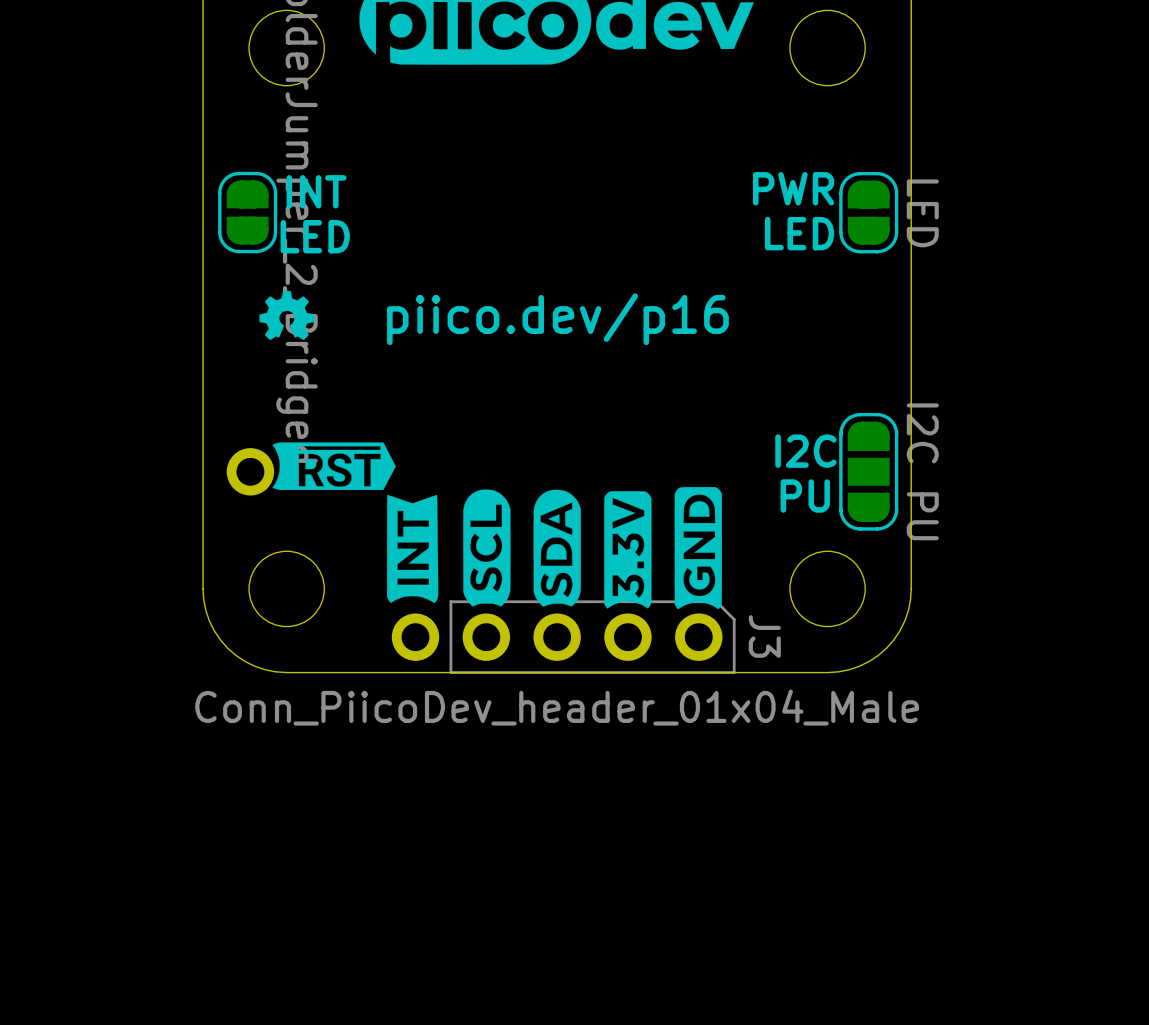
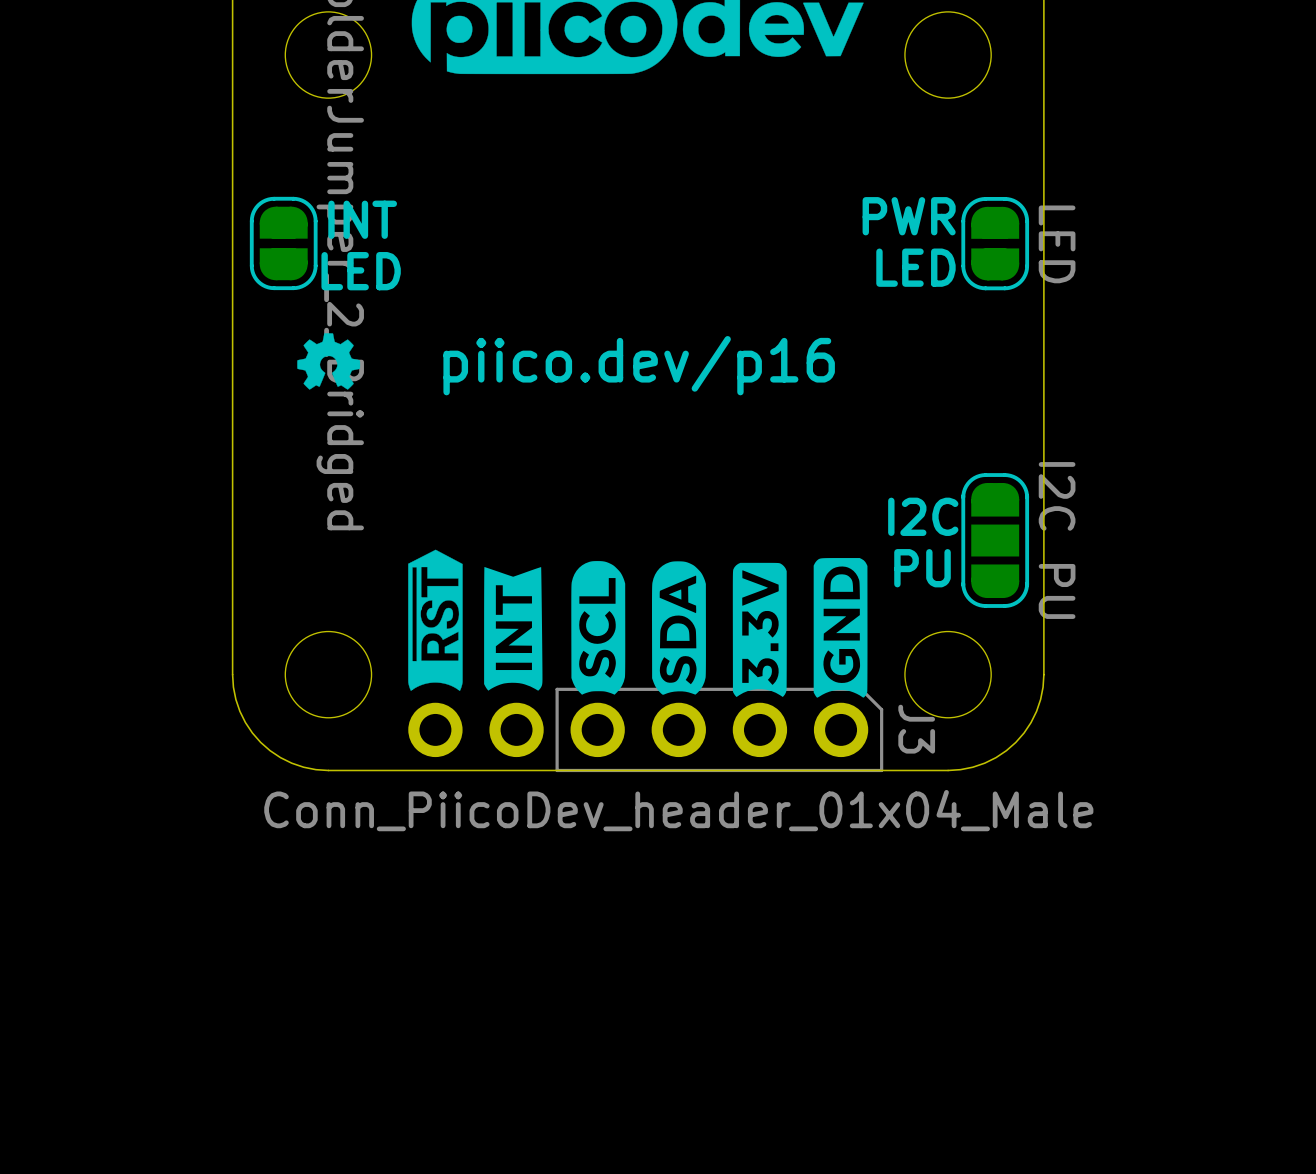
drawing: [272, 442, 396, 491] -> none
part position: (250, 471) -> (435, 729)
drawing: none -> [408, 549, 463, 692]
J3 footprint: [449, 486, 736, 674] -> [555, 558, 884, 773]
part: (413, 577) -> none
part: none -> (513, 662)

